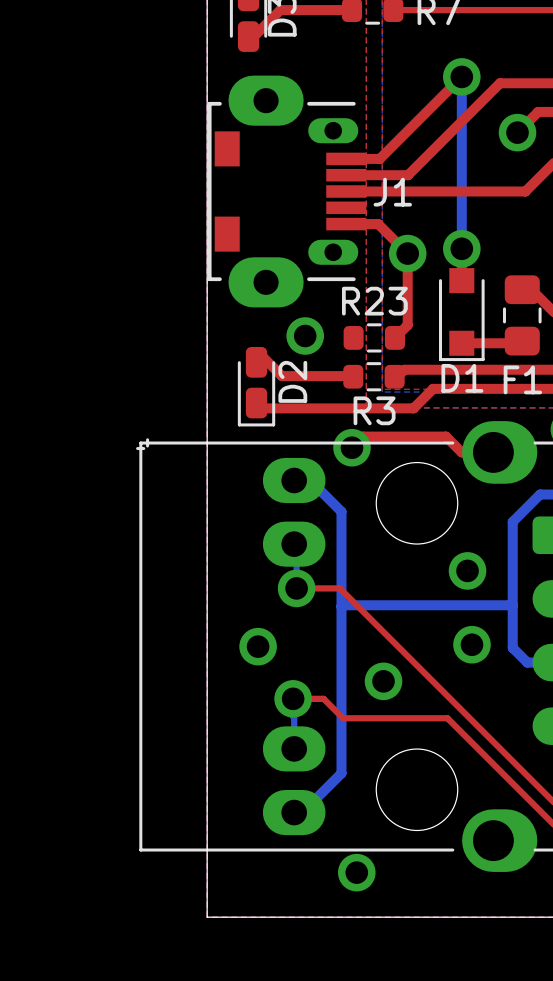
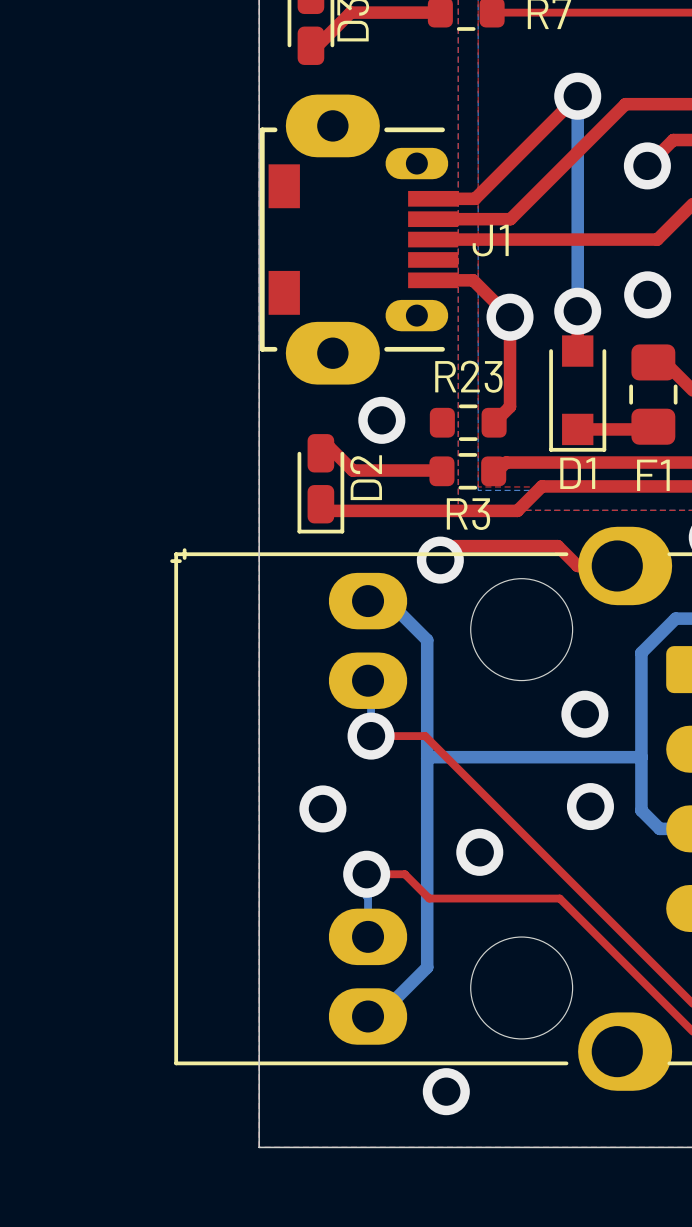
via: none -> (647, 294)

